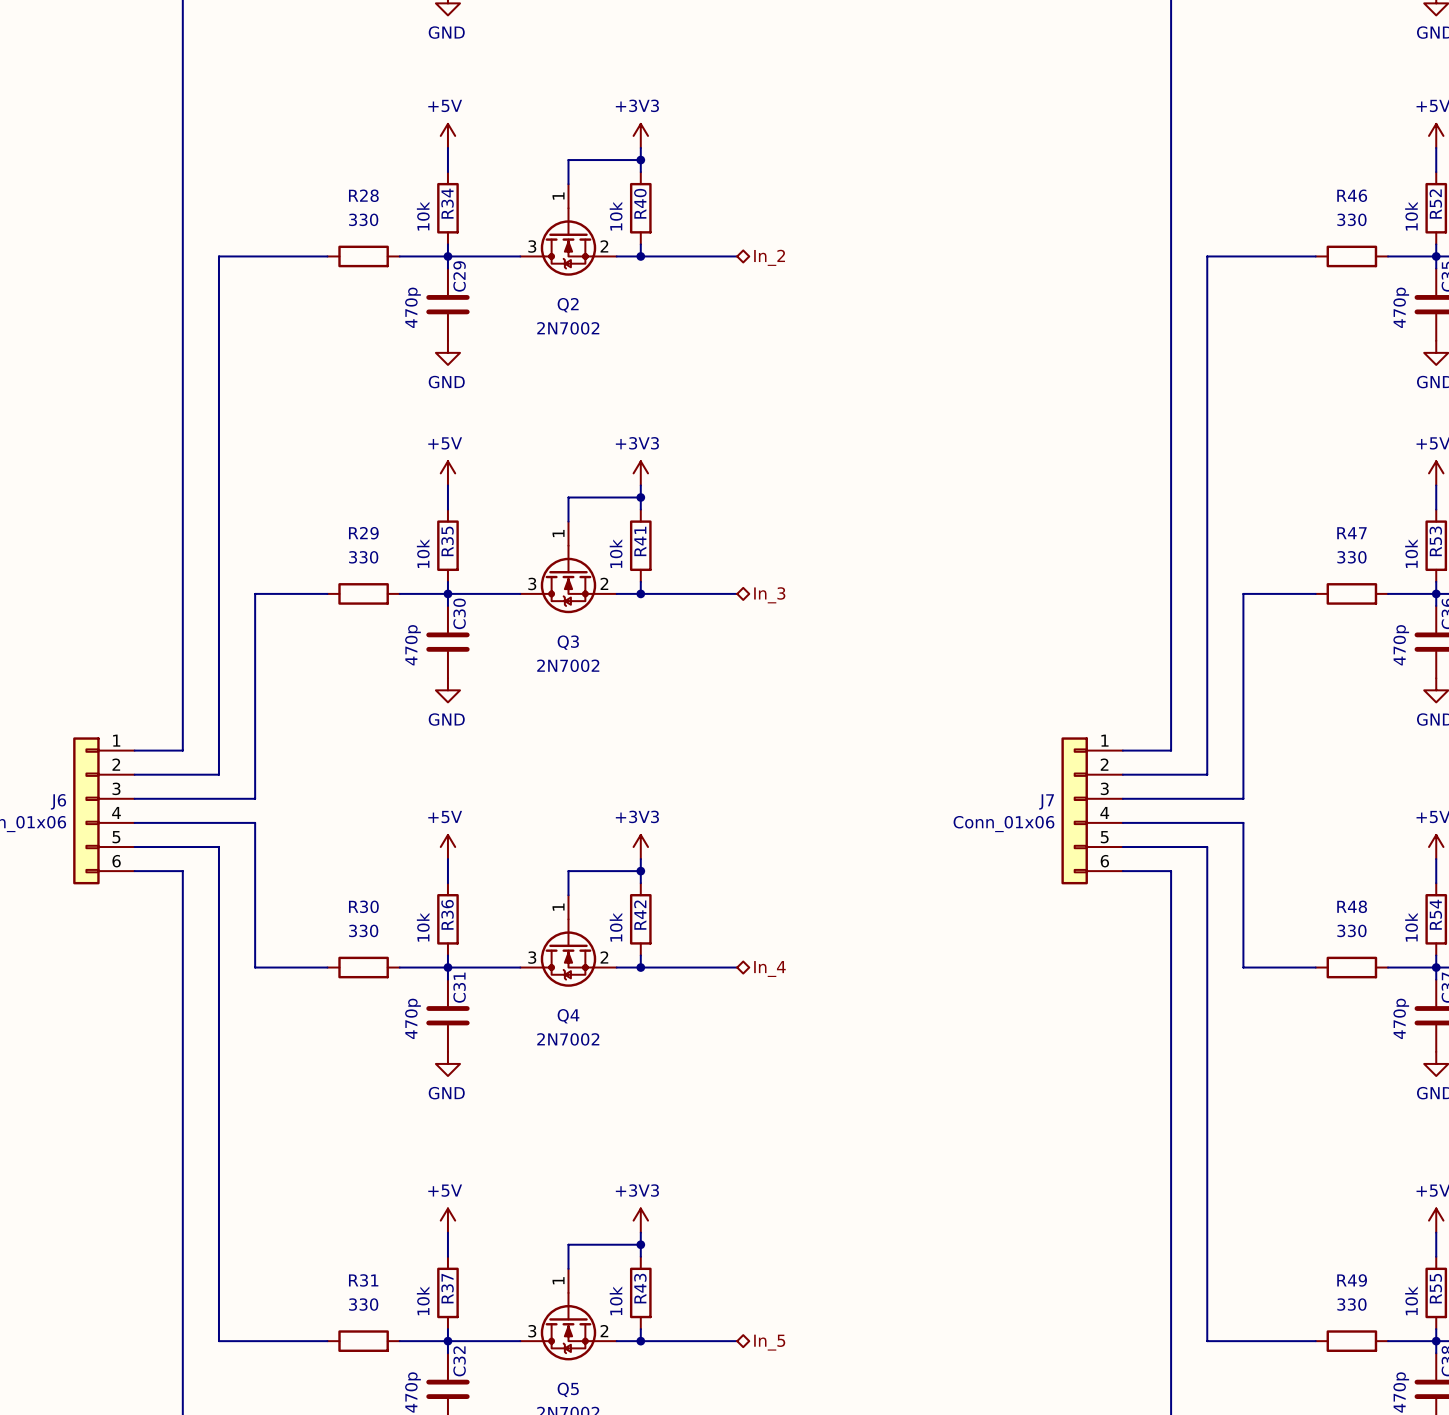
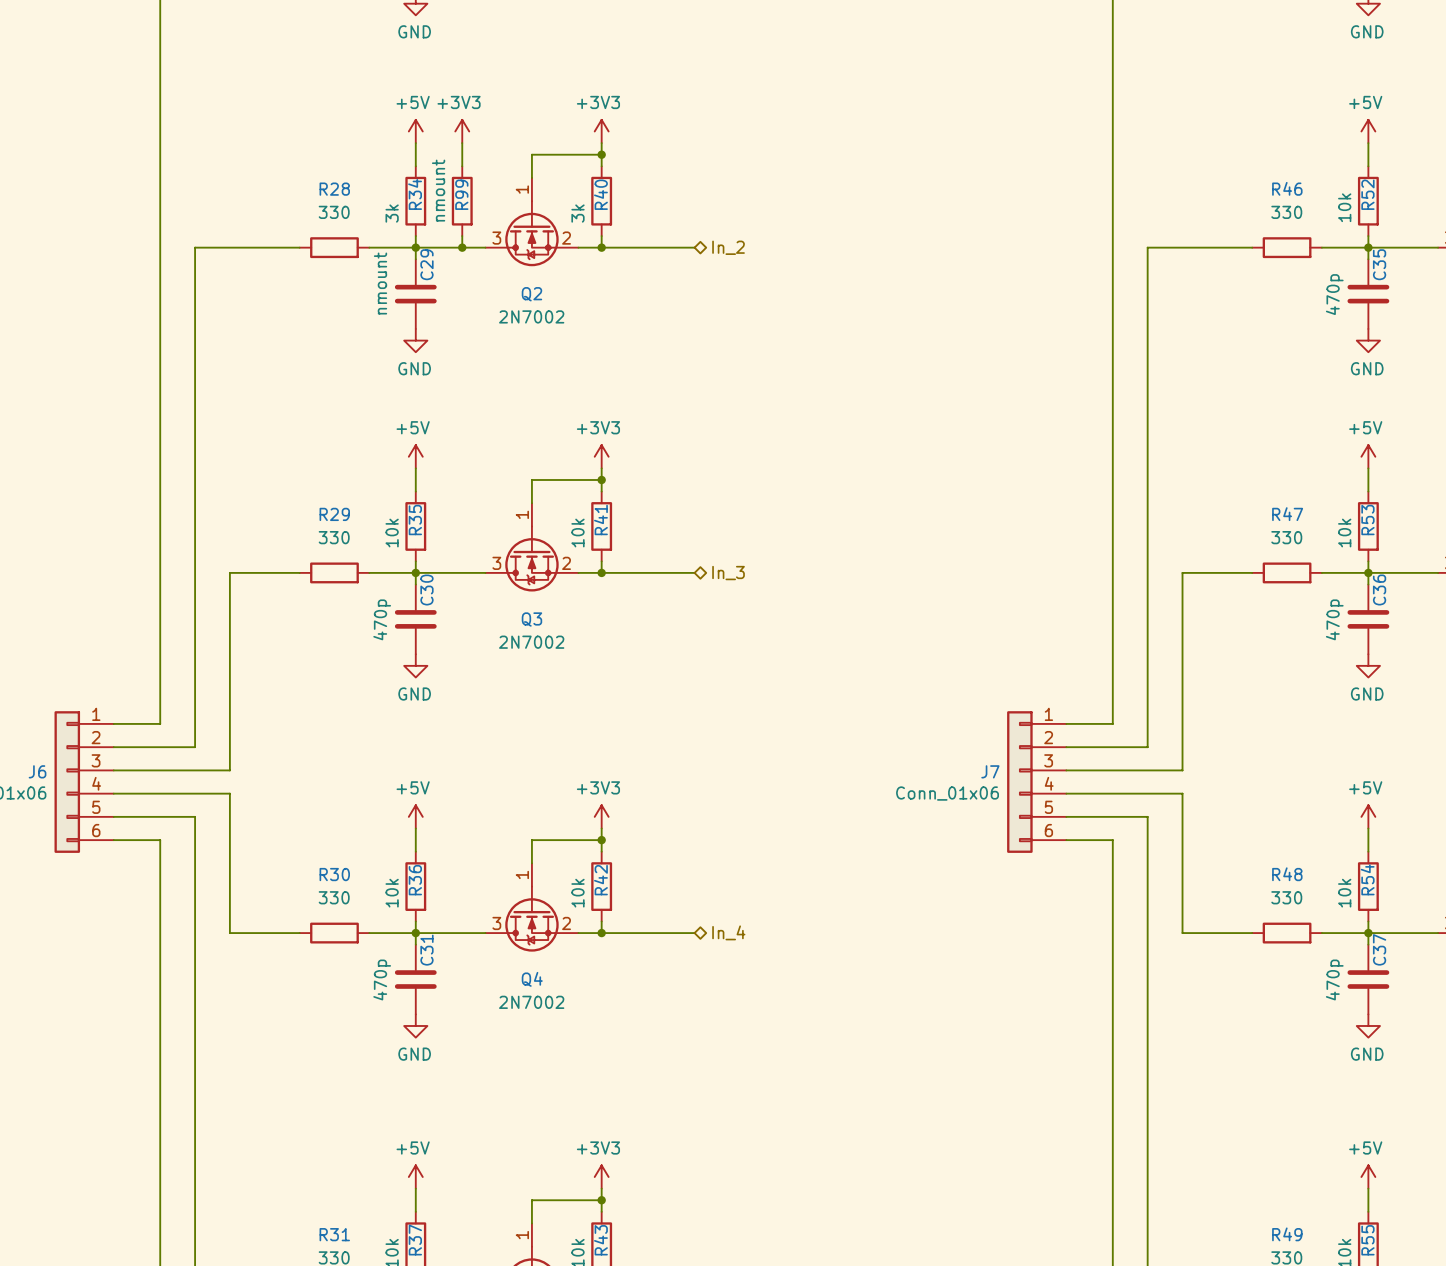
power symbol: none -> +3V3 (462, 131)
wire: none -> (462, 143) (462, 166)
R99: none -> nmount (462, 201)
R34 value: 10k (423, 216) -> 3k (392, 213)
R40 value: 10k (616, 216) -> 3k (577, 213)
wire: none -> (462, 236) (462, 247)
junction: none -> (462, 247)
C29 value: 470p (412, 307) -> nmount (380, 283)

